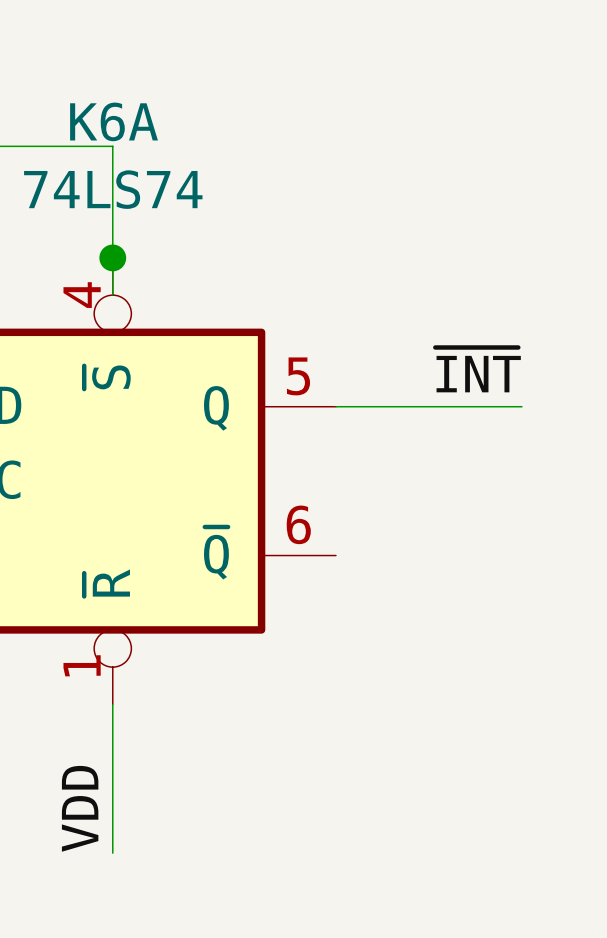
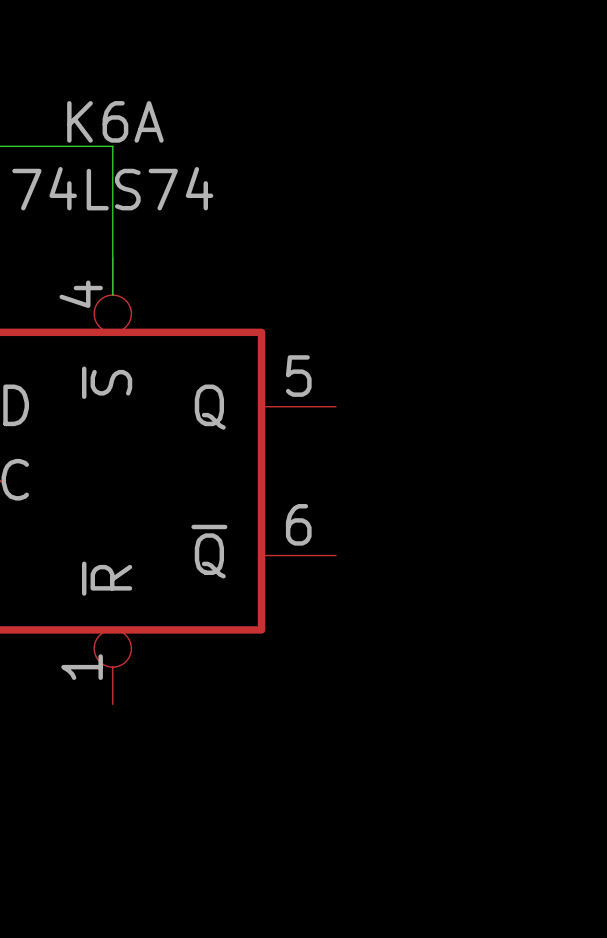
junction: (112, 257) -> none
label: ~{INT} (478, 369) -> none
wire: (335, 406) (521, 406) -> none
wire: (112, 704) (112, 853) -> none
label: VDD (80, 808) -> none

